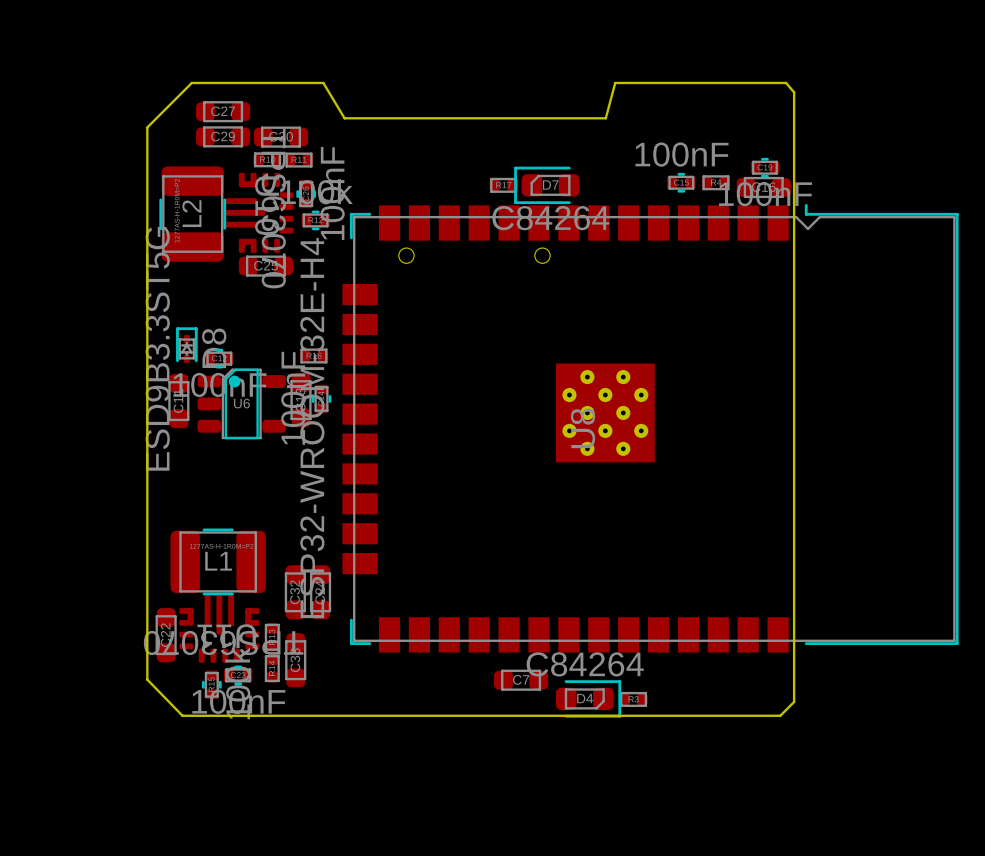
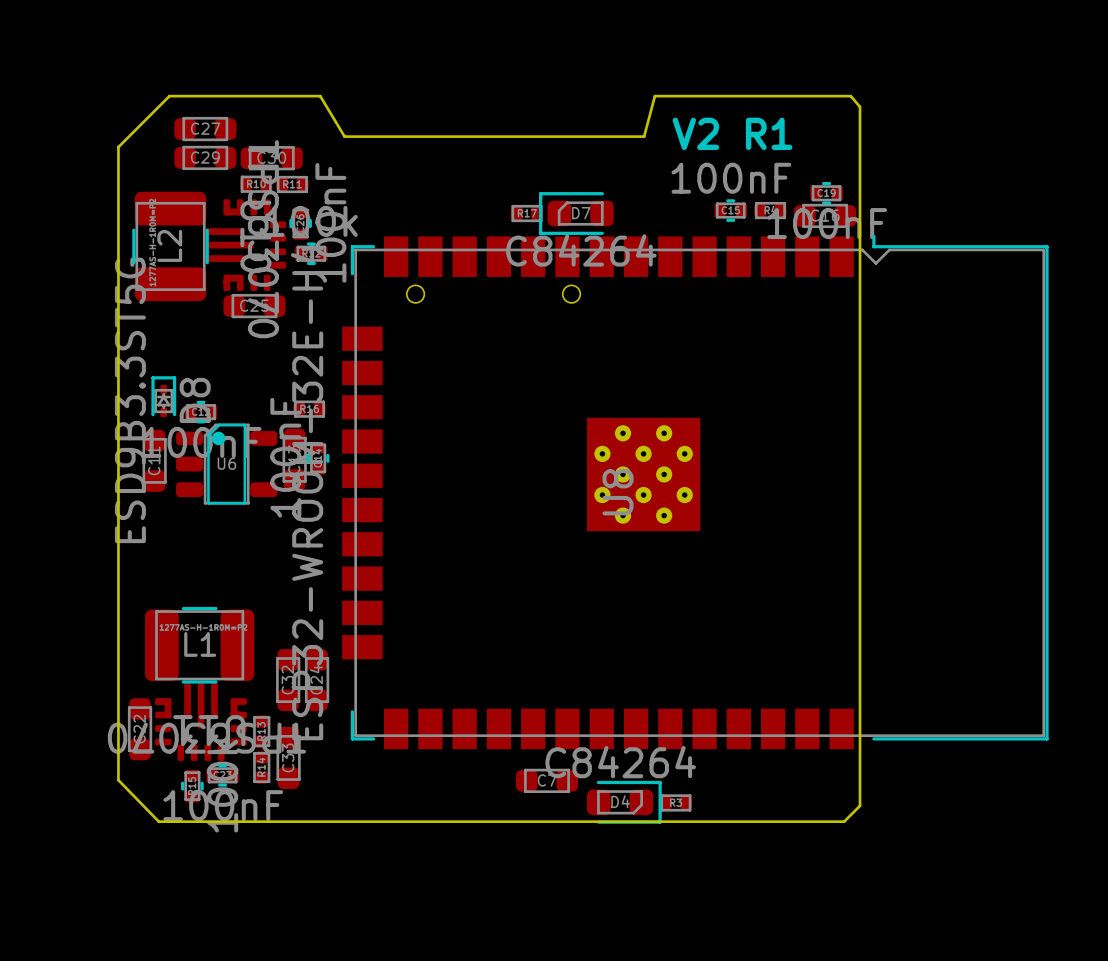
text: none -> V2 R1 (732, 133)

